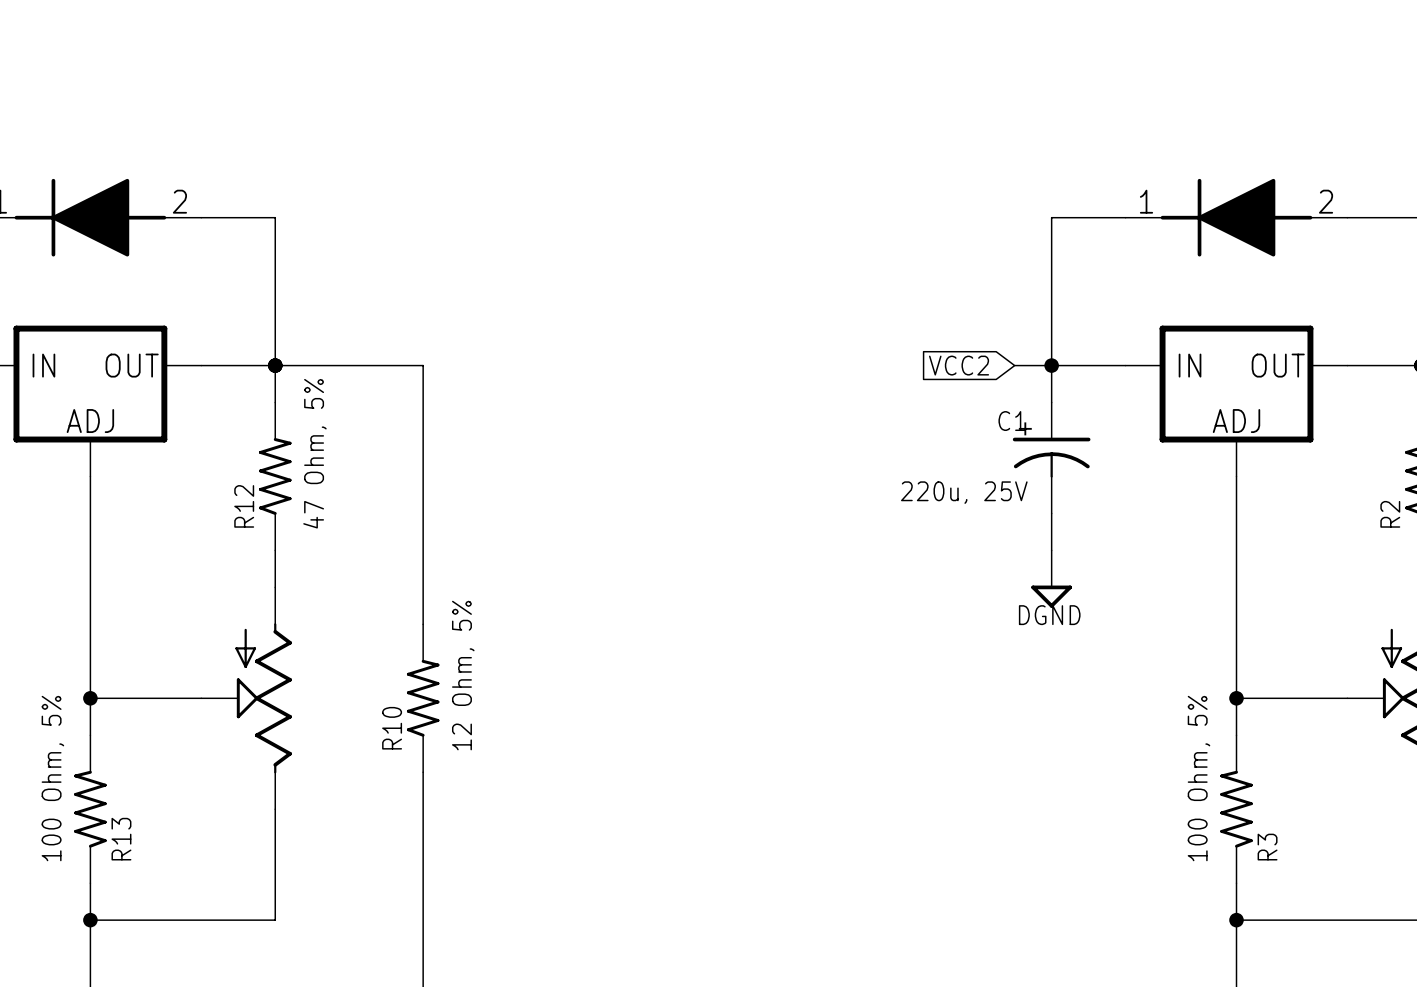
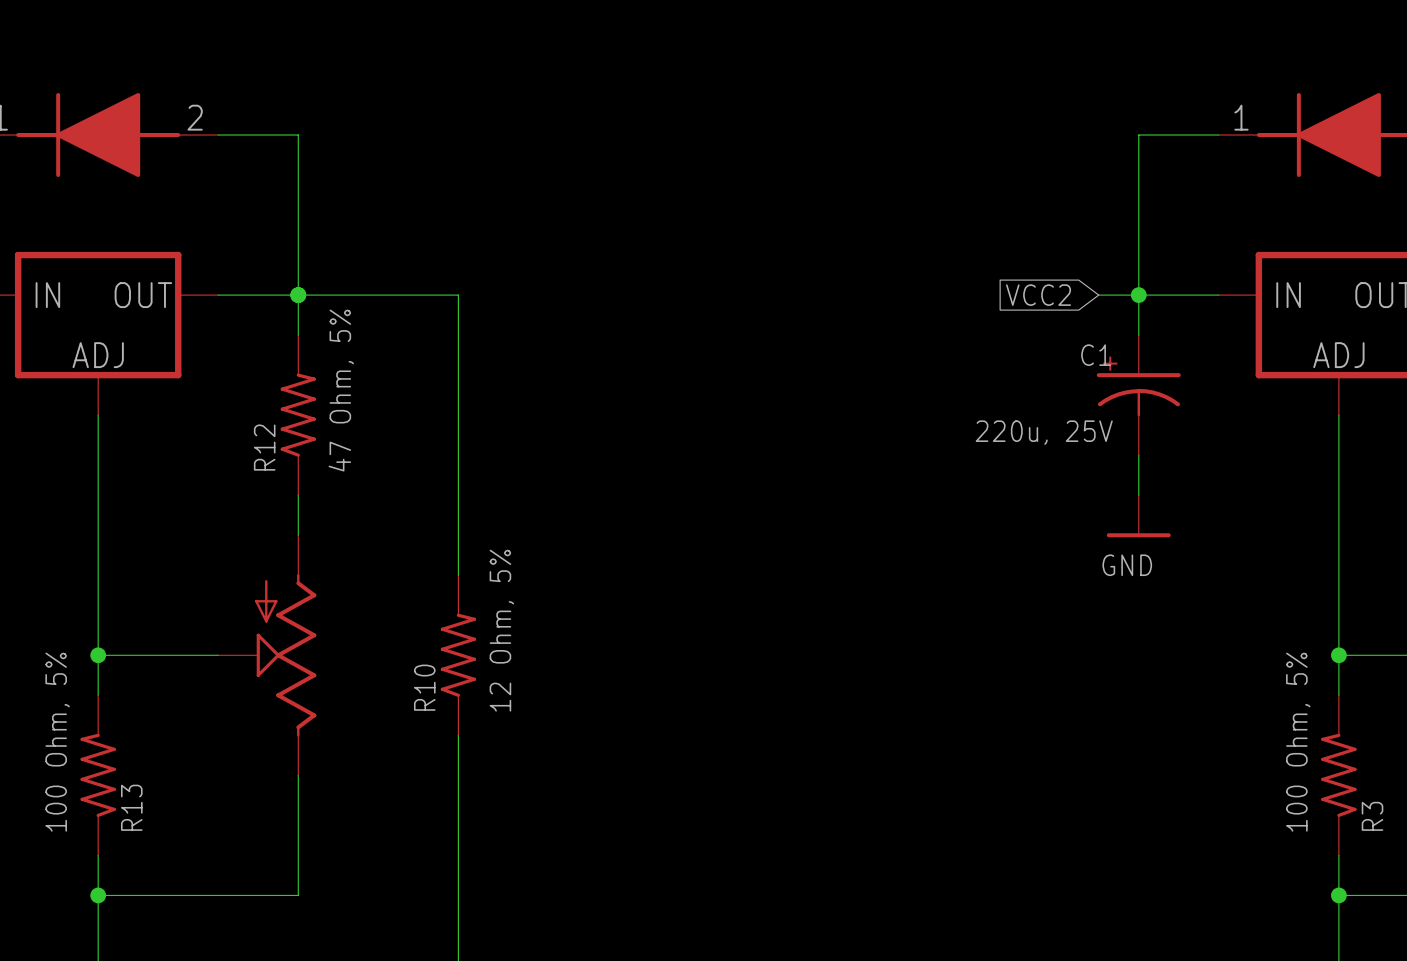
power symbol: DGND (1051, 579) -> GND (1138, 516)

